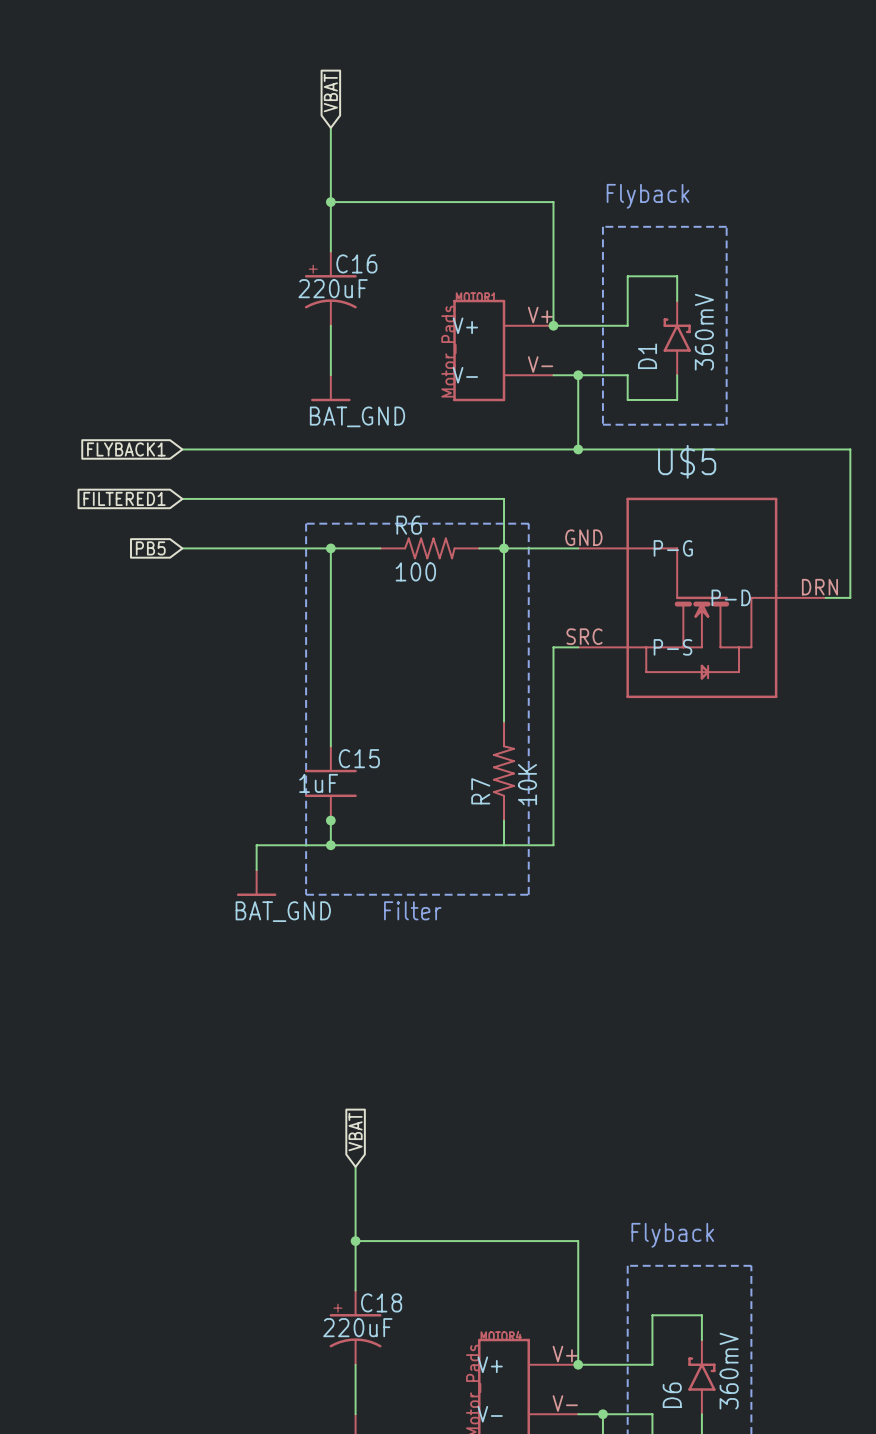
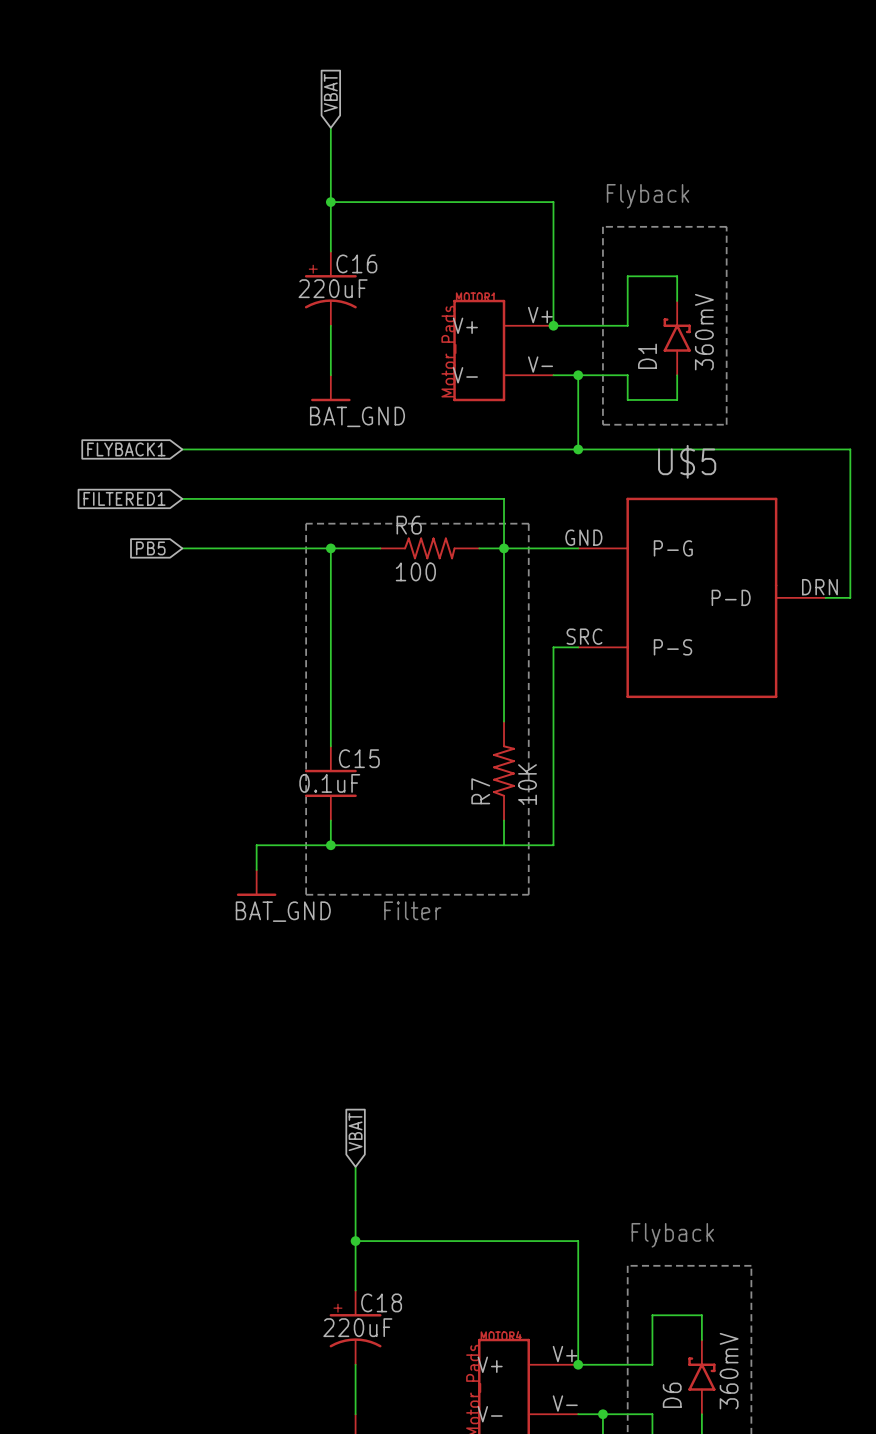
U$5 symbol: [578, 497, 826, 699] -> [578, 497, 826, 699]
C15 value: 1uF (318, 783) -> 0.1uF (329, 783)
junction: (330, 820) -> none

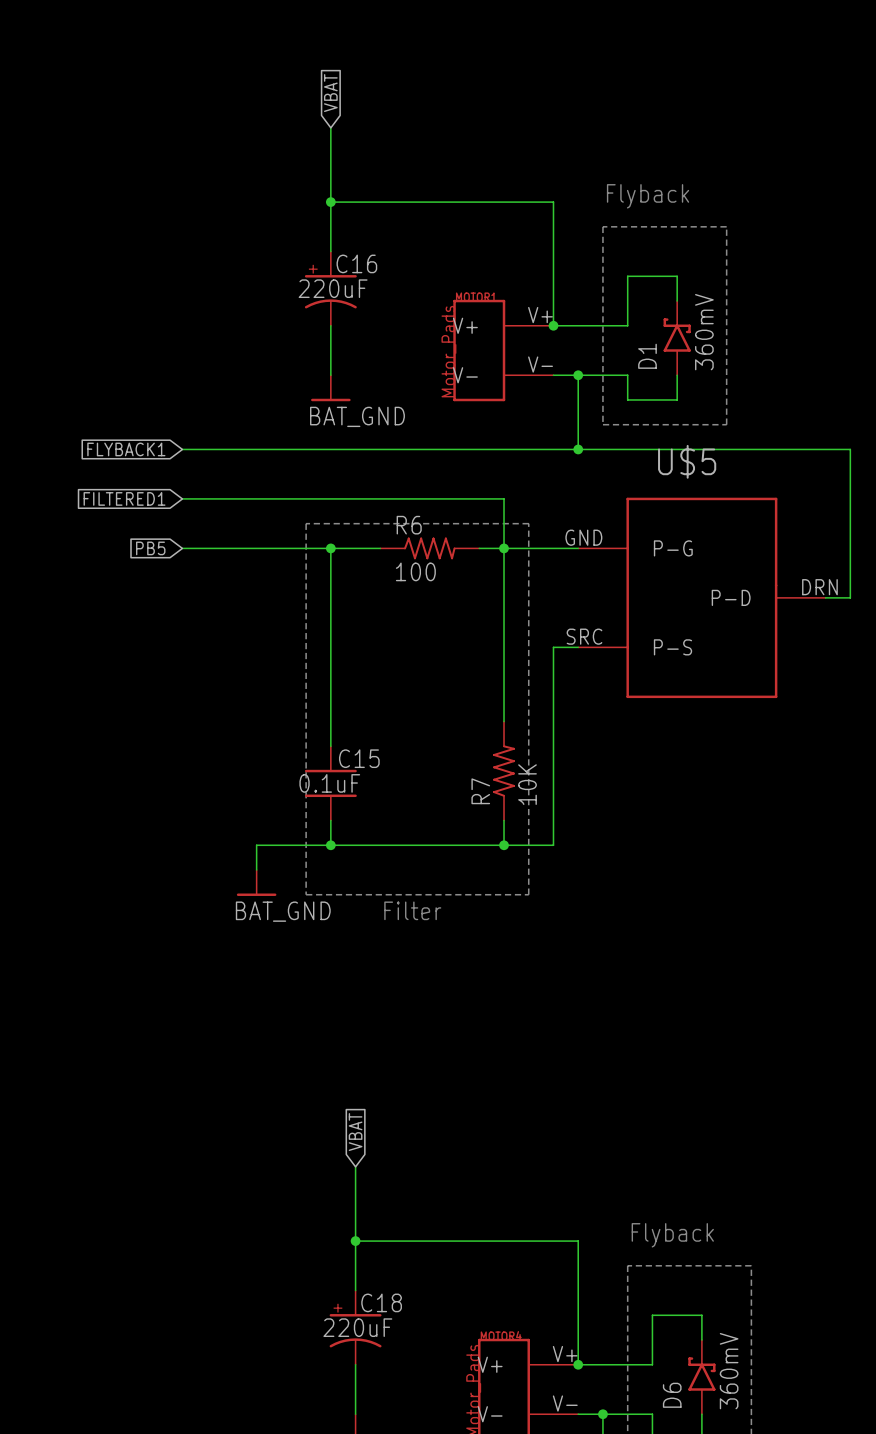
junction: none -> (504, 845)

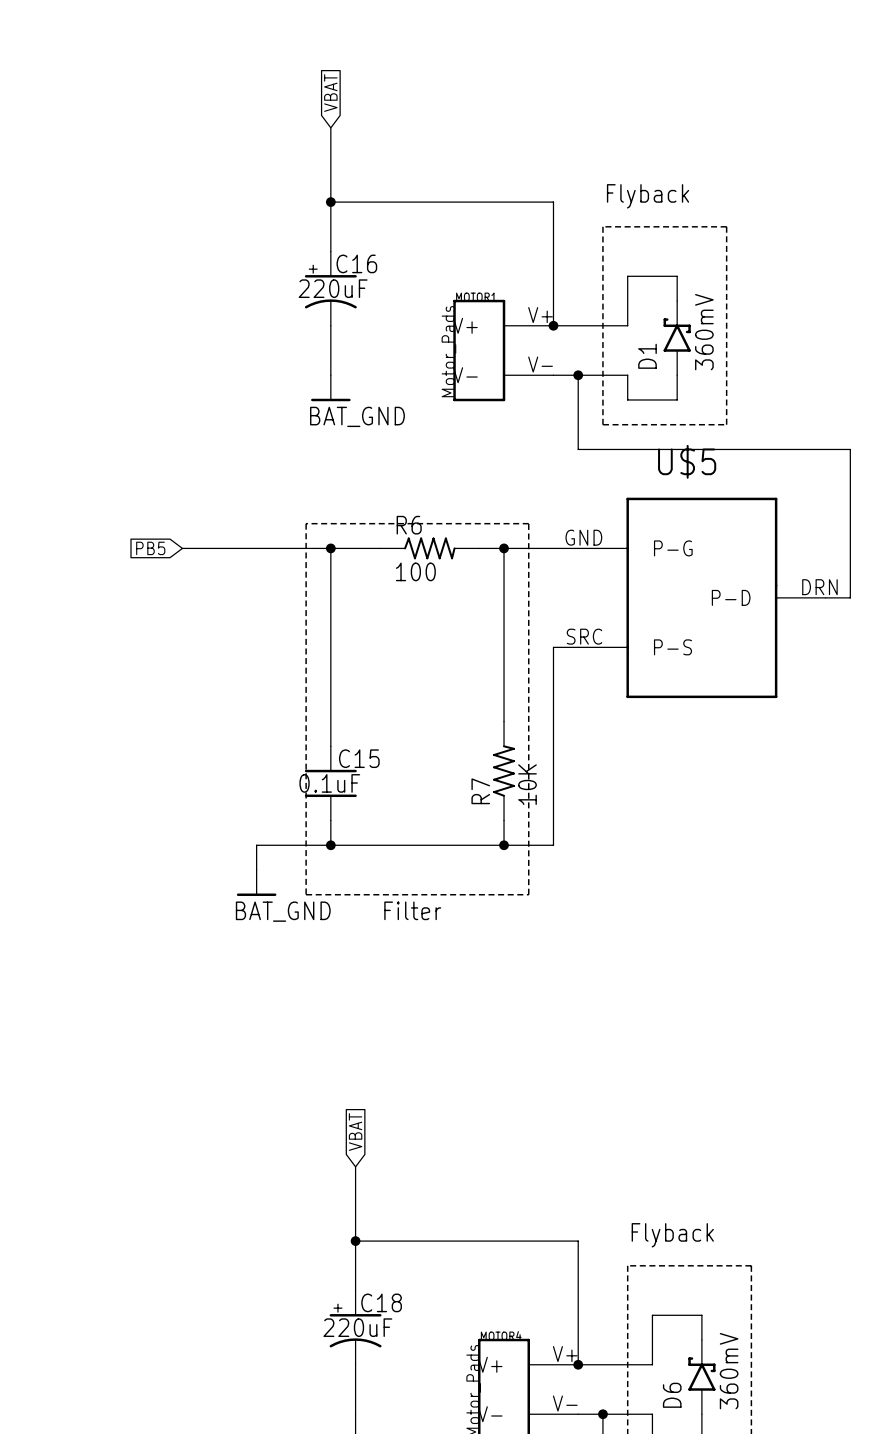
global label: FLYBACK1 (126, 449) -> none
wire: (182, 449) (578, 449) -> none
junction: (578, 449) -> none
global label: FILTERED1 (124, 498) -> none
wire: (182, 498) (504, 498) (504, 548) -> none

